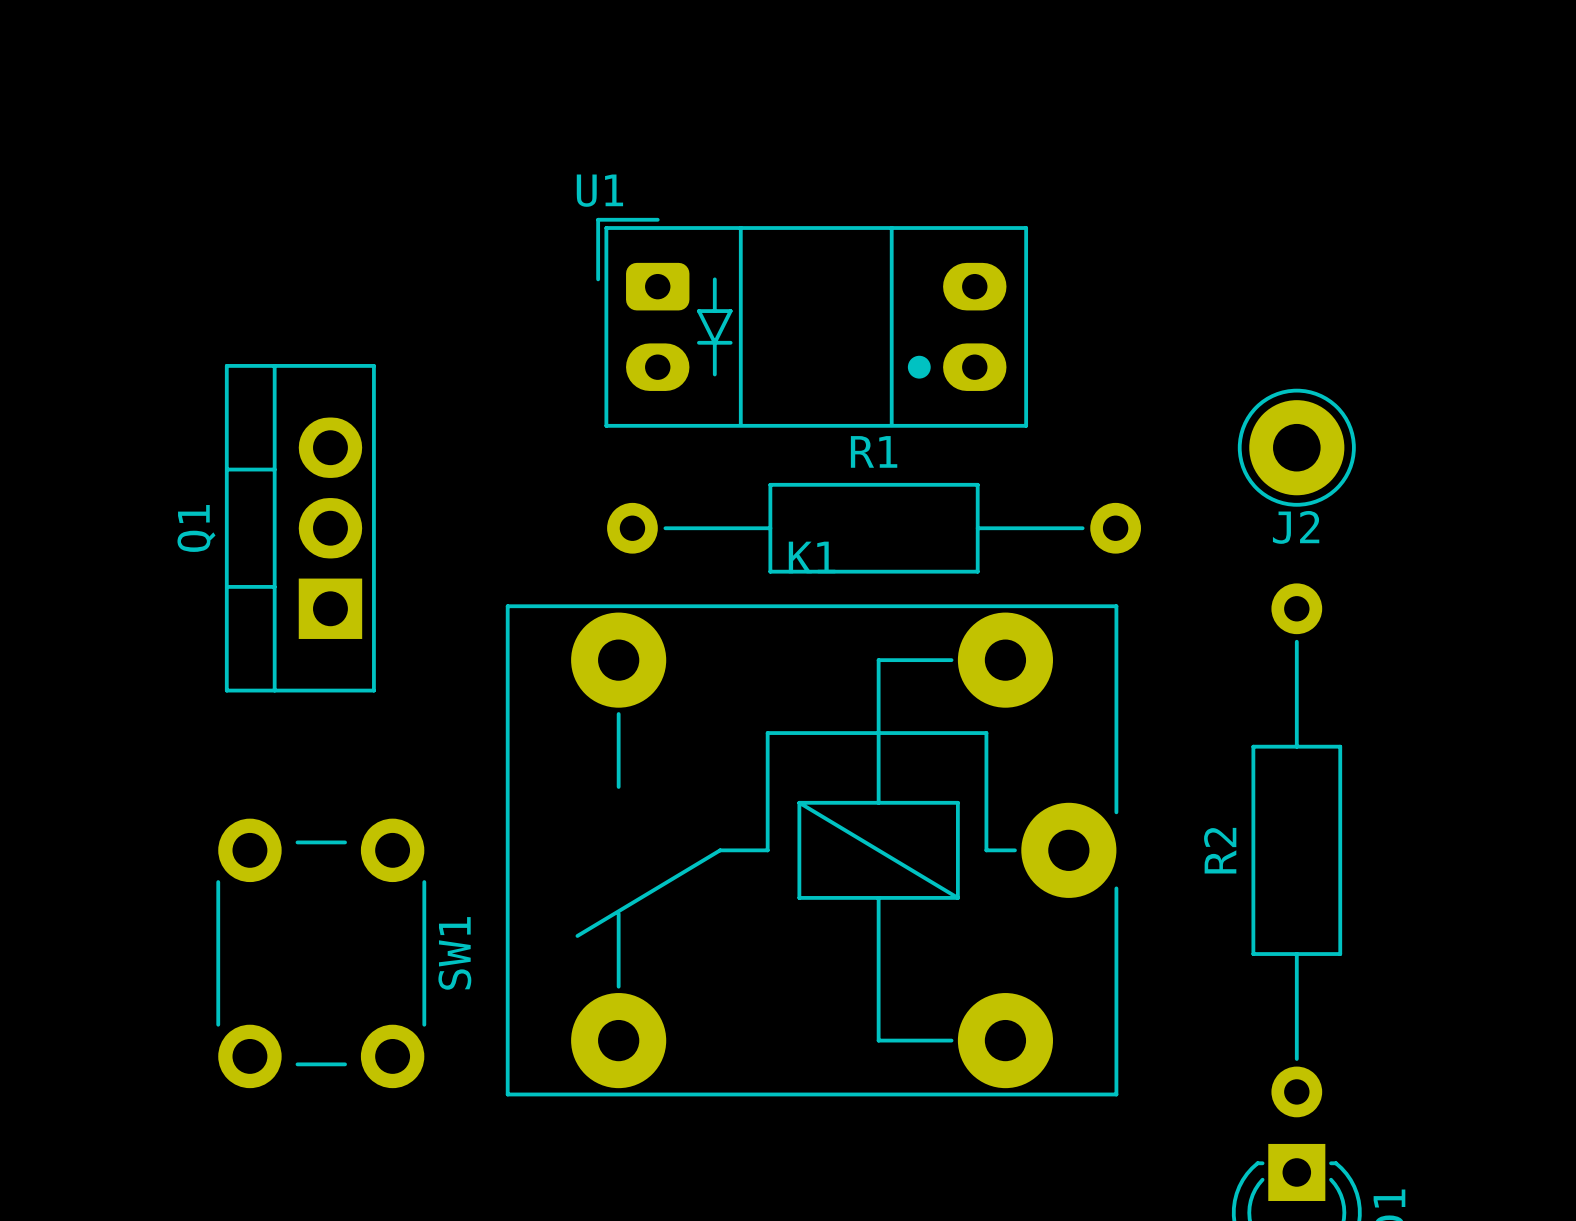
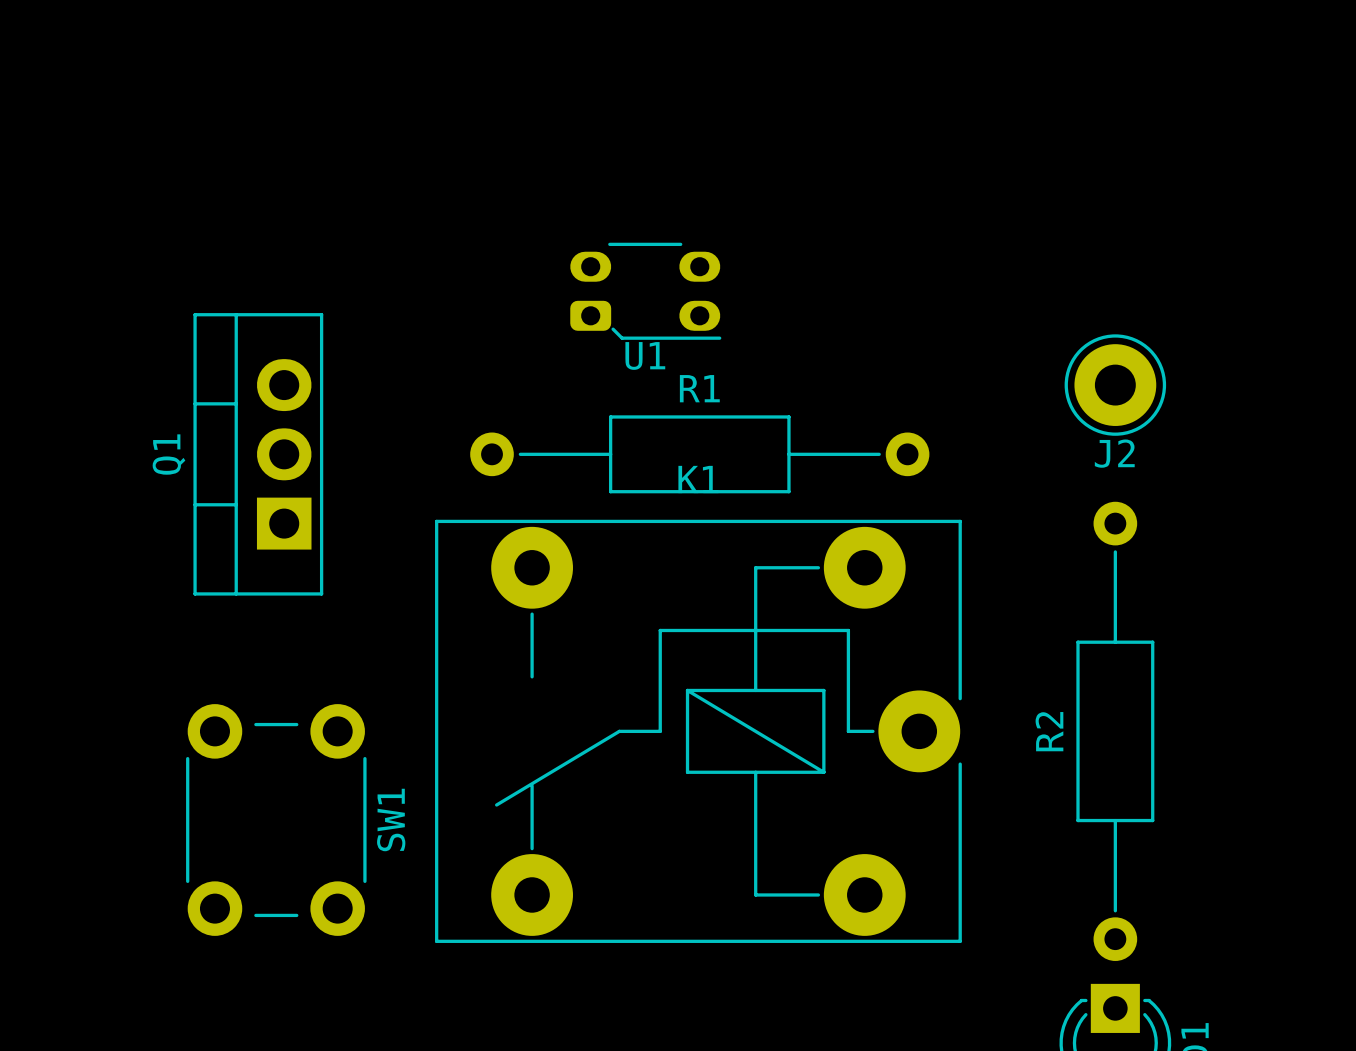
U1 name position: U1 (599, 190) -> U1 (645, 355)
U1 footprint: [596, 217, 1029, 428] -> [570, 242, 722, 340]
R1 position: (874, 528) -> (699, 454)

